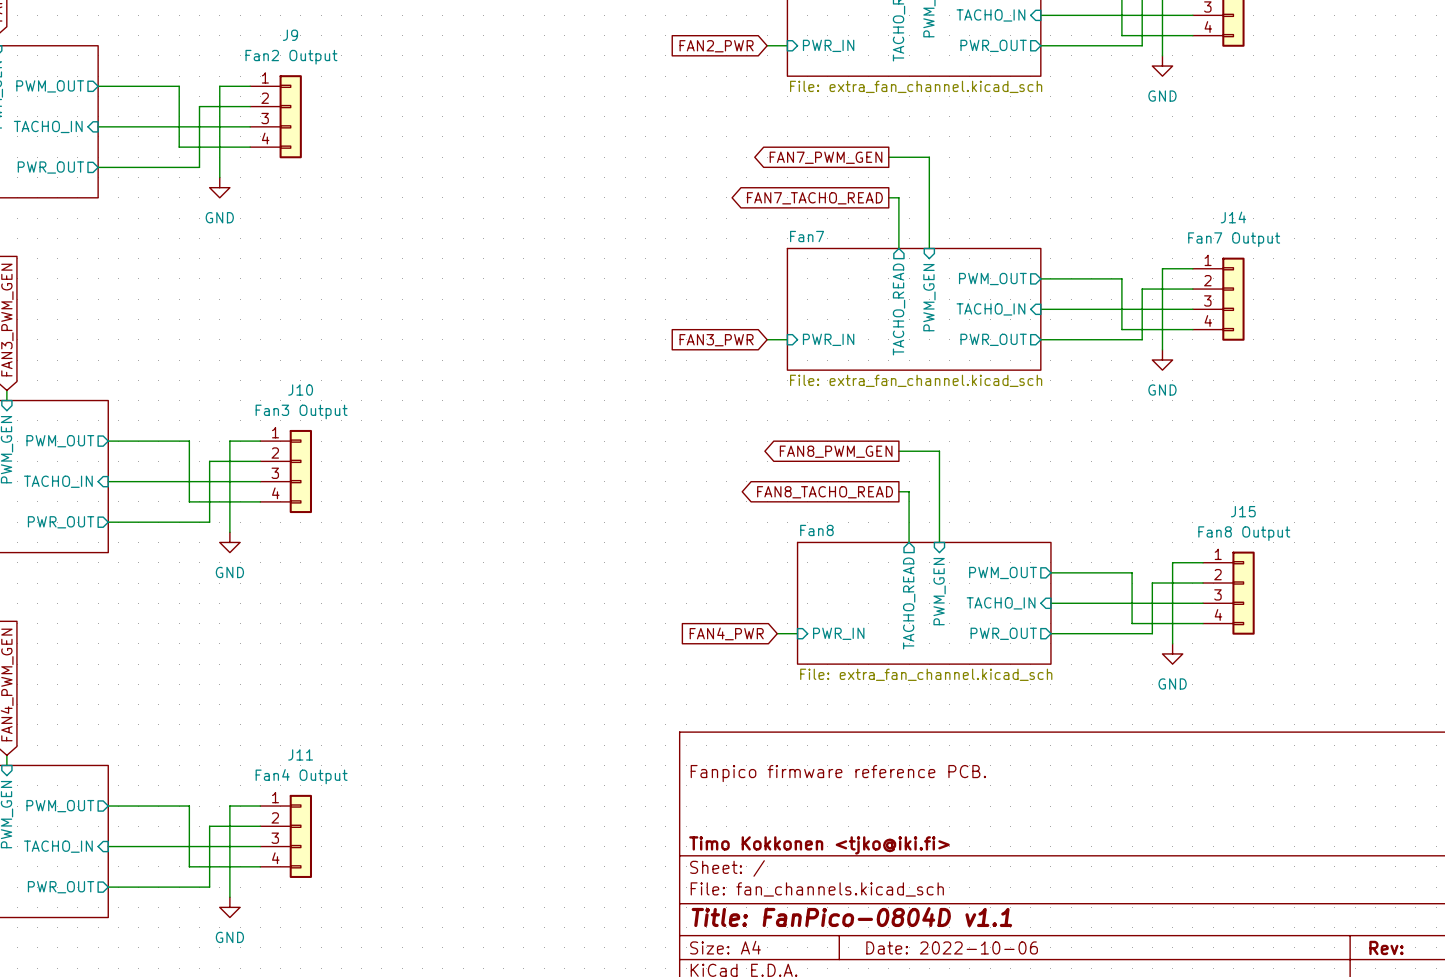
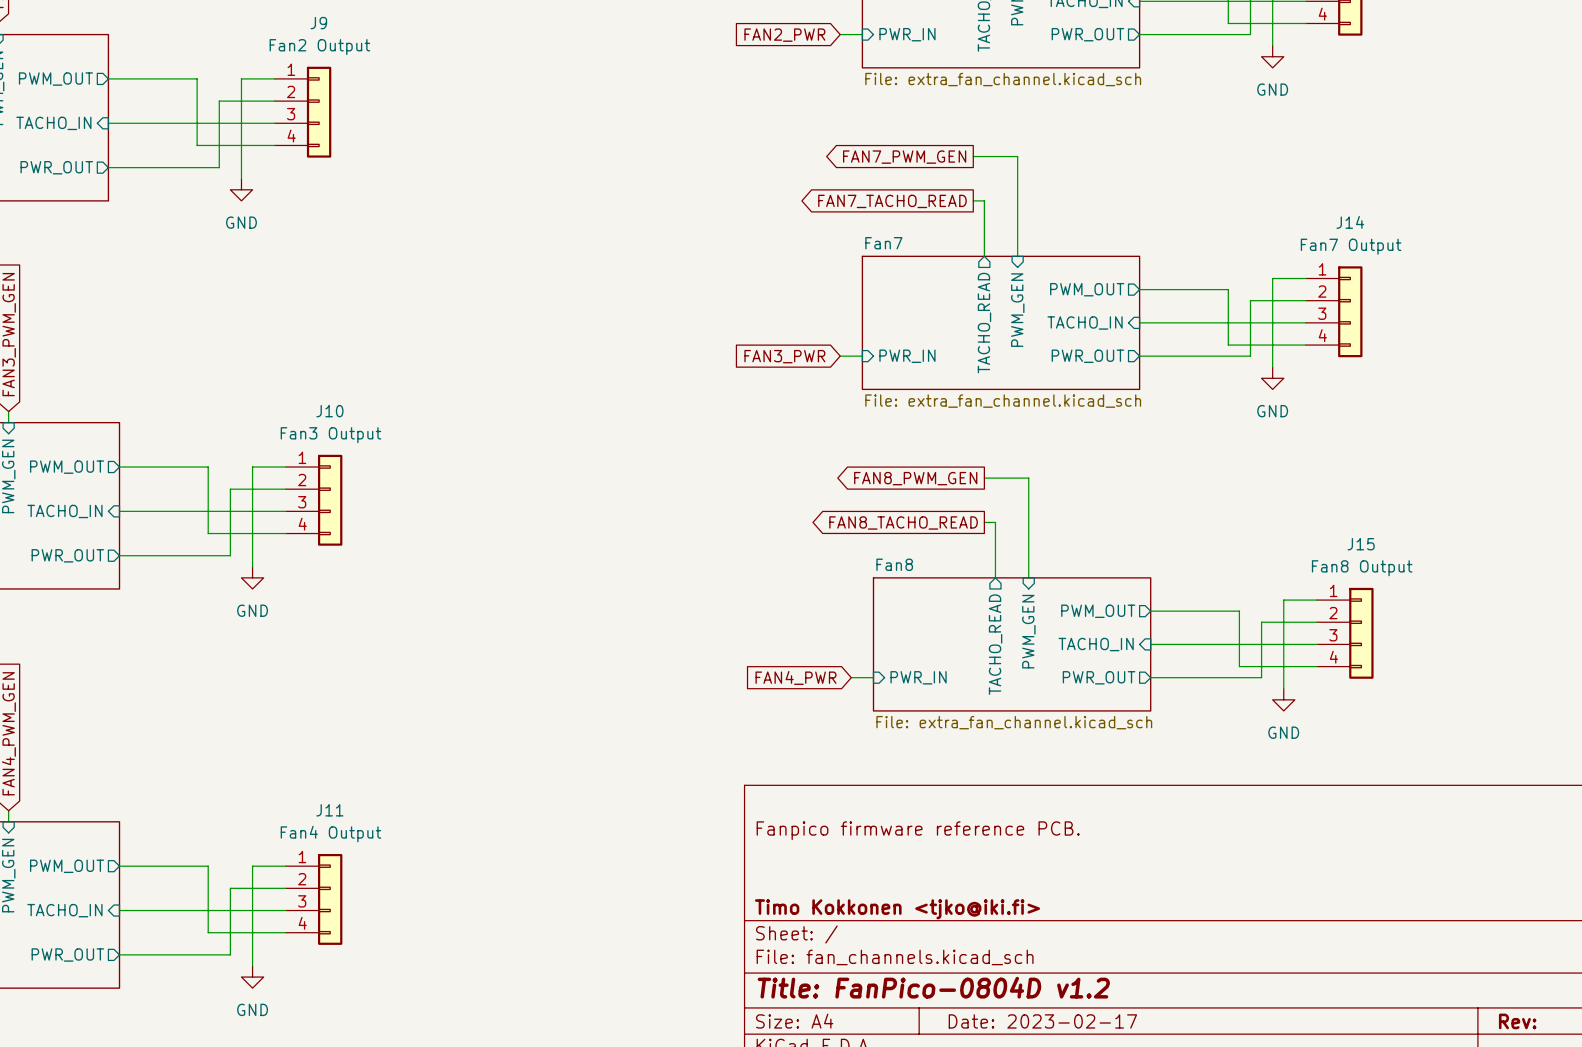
title block: Title: FanPico-0804D v1.1 (851, 917) -> Title: FanPico-0804D v1.2 (933, 987)
title block: Date: 2022-10-06 (952, 947) -> Date: 2023-02-17 (1042, 1021)

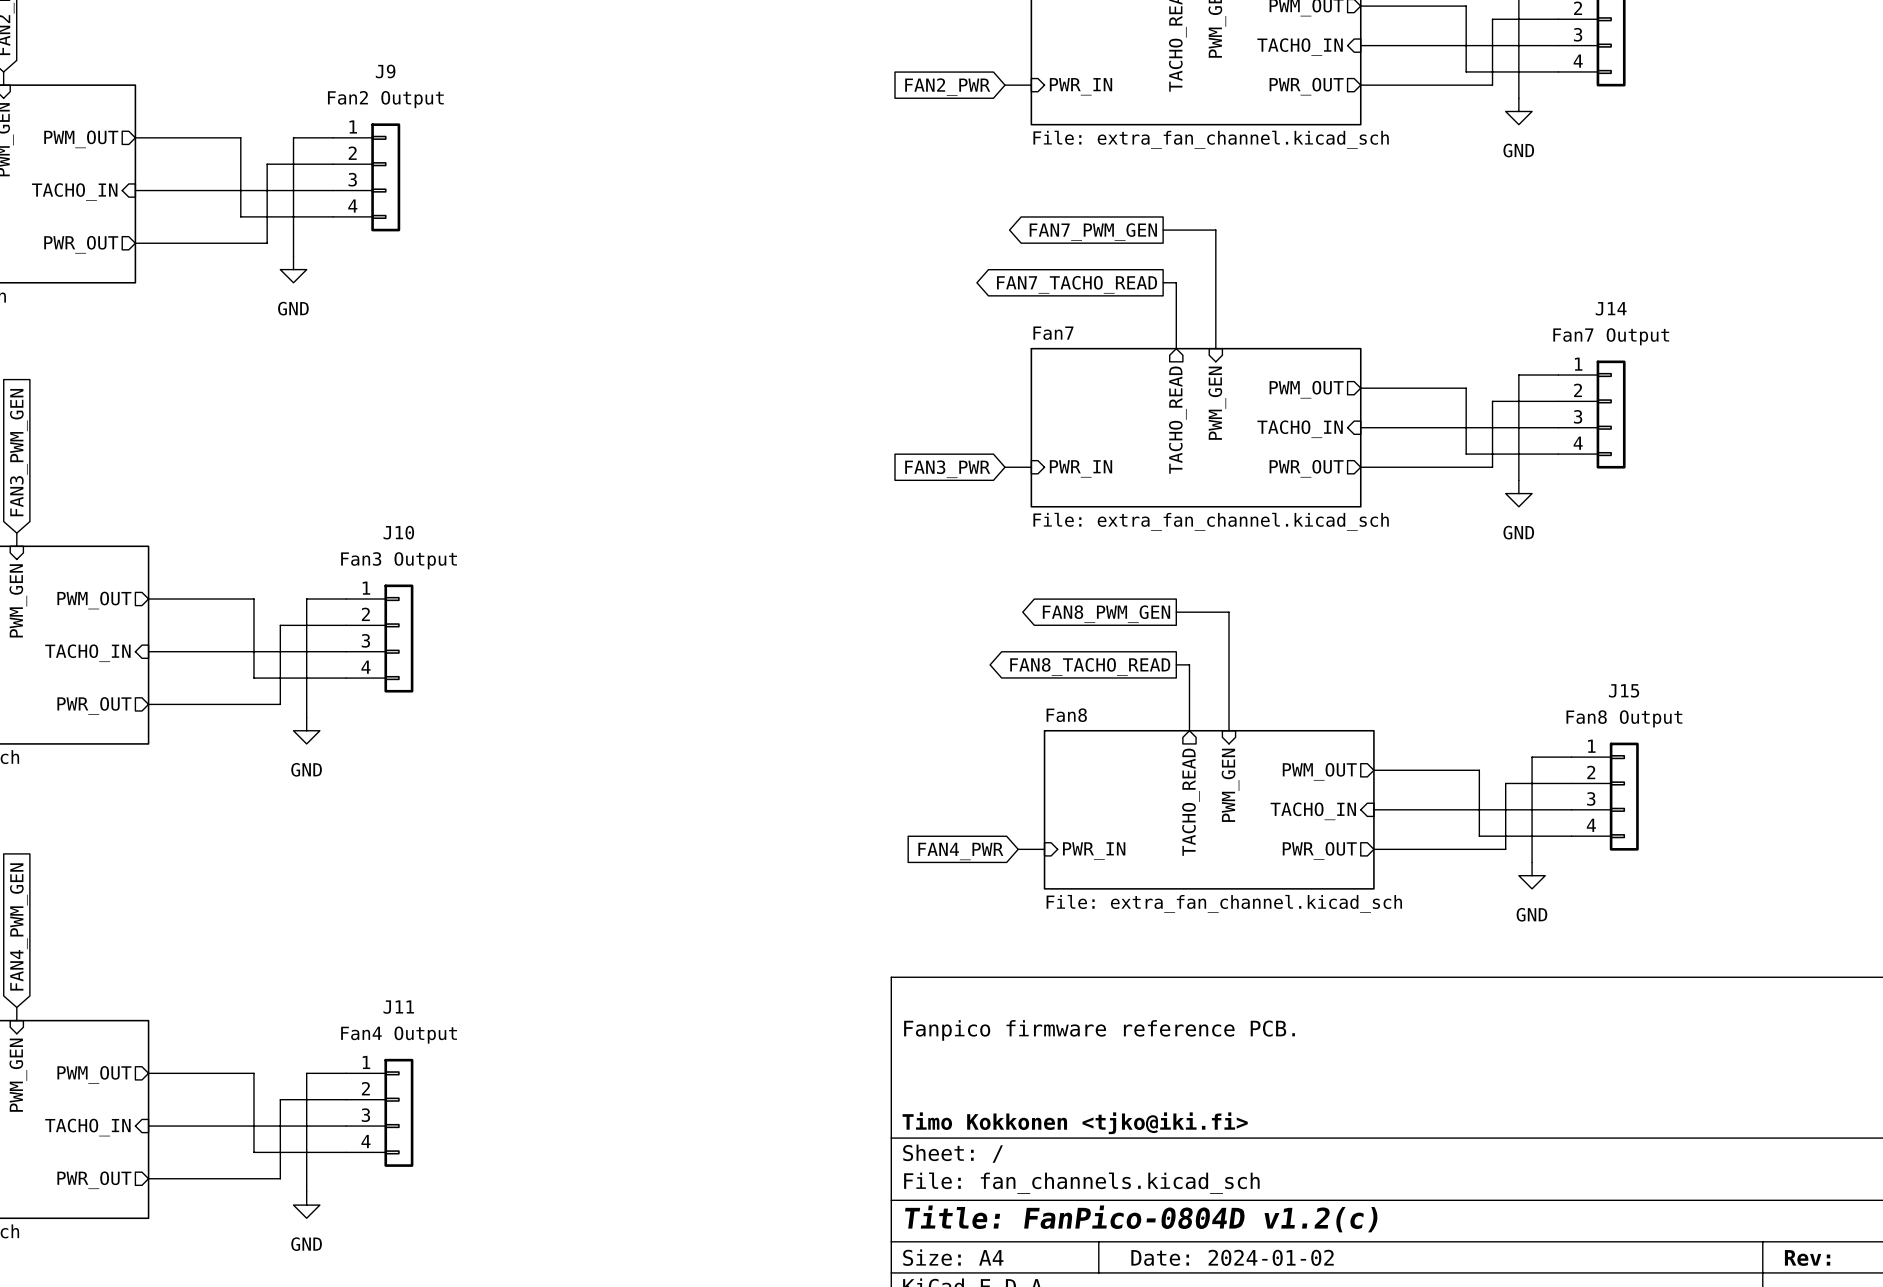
title block: Title: FanPico-0804D v1.2 (933, 987) -> Title: FanPico-0804D v1.2(c) (1141, 1218)
title block: Date: 2023-02-17 (1042, 1021) -> Date: 2024-01-02 (1232, 1257)

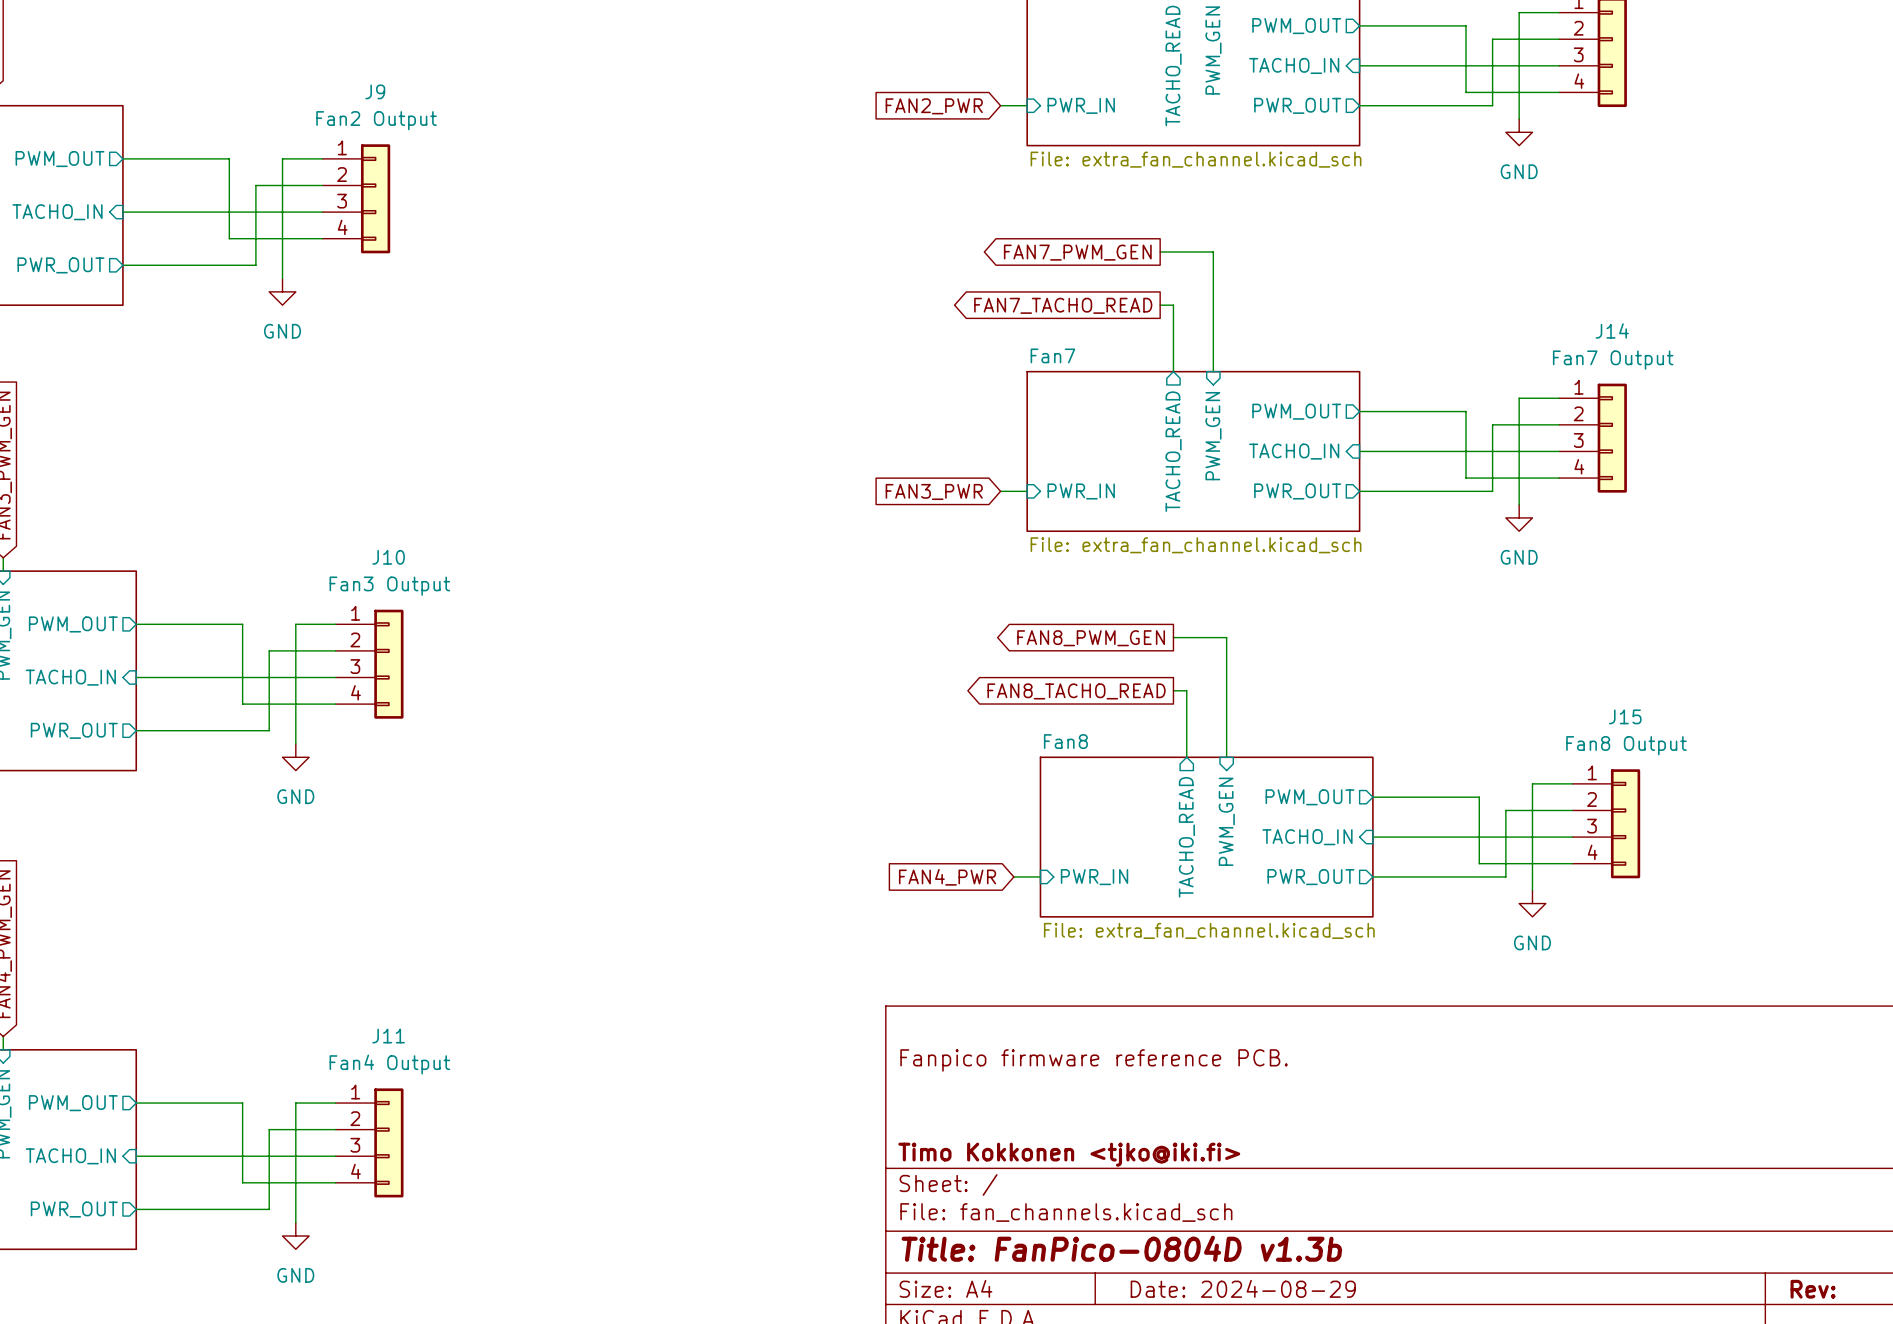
title block: Title: FanPico-0804D v1.2(c) (1141, 1218) -> Title: FanPico-0804D v1.3b (1121, 1248)
title block: Date: 2024-01-02 (1232, 1257) -> Date: 2024-08-29 (1243, 1288)

